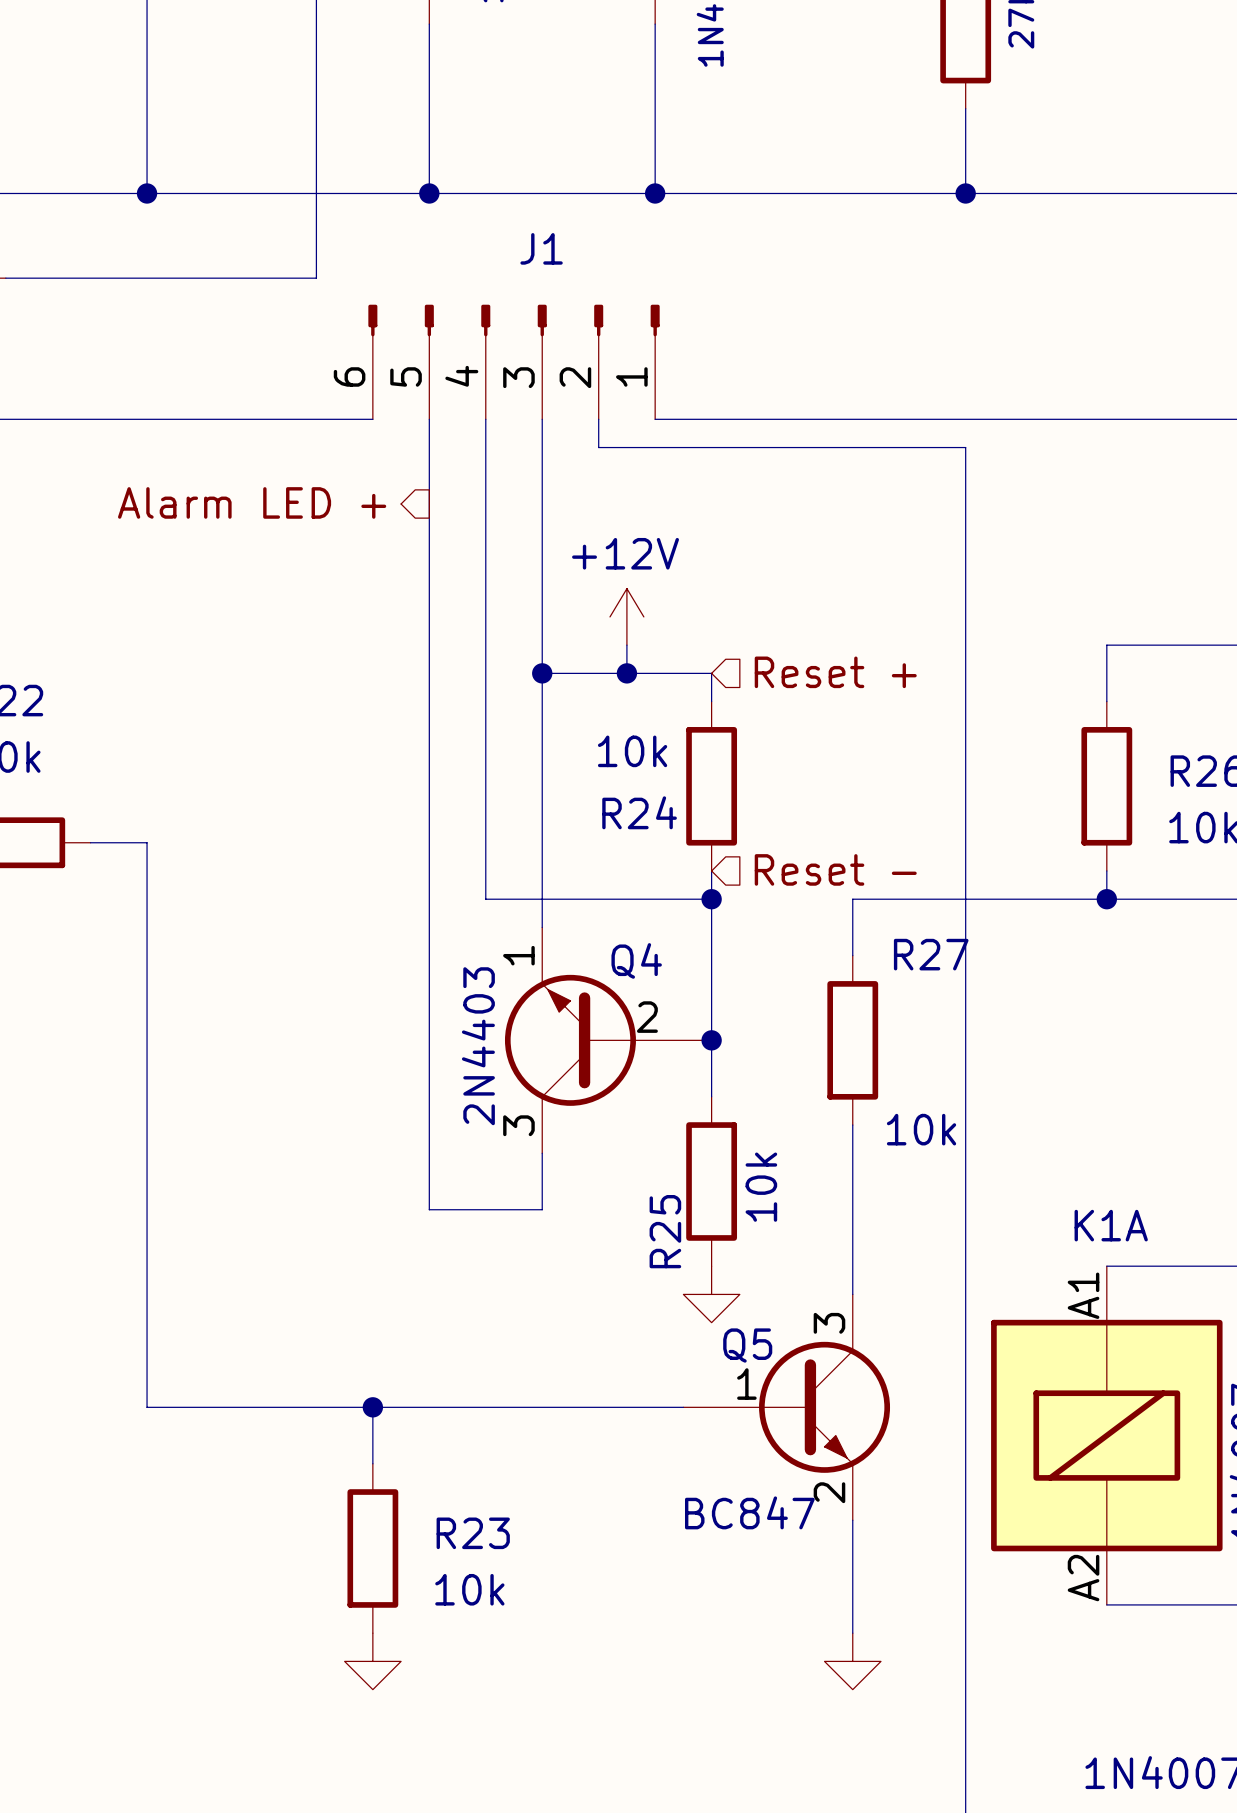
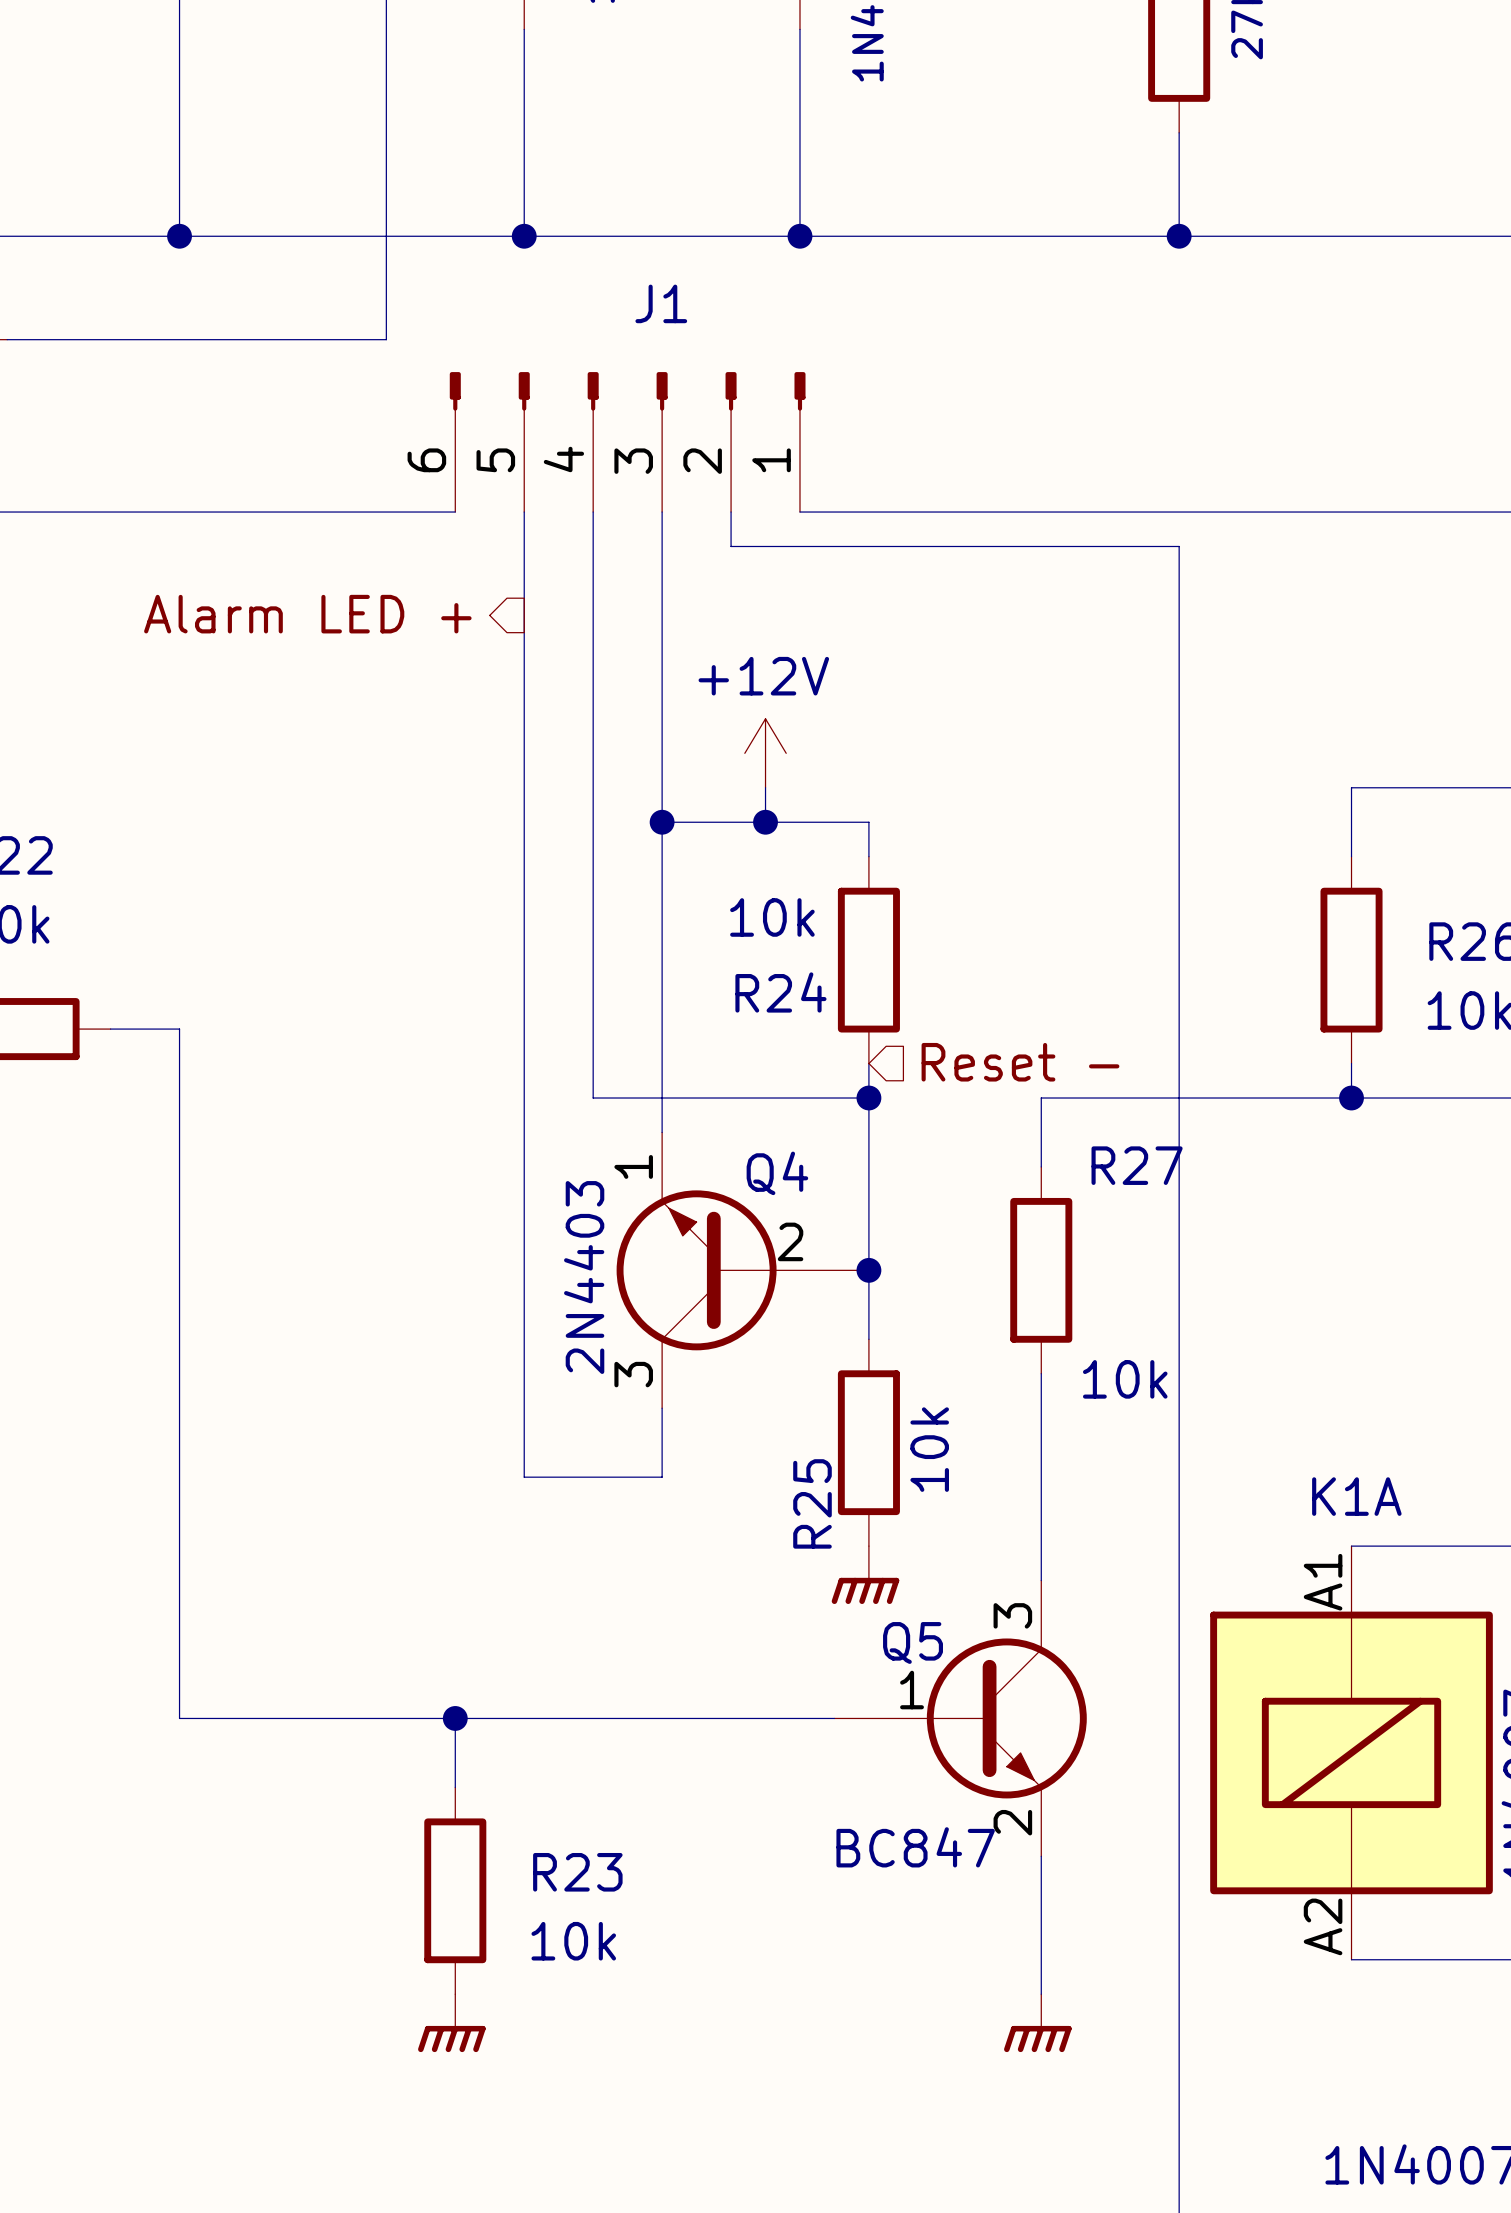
hierarchical label: Reset + (835, 672) -> none
power symbol shape: [683, 1266, 740, 1323] -> [831, 1546, 900, 1605]
power symbol shape: [344, 1633, 402, 1690] -> [418, 1994, 486, 2053]
power symbol shape: [824, 1633, 881, 1690] -> [1004, 1994, 1072, 2053]

